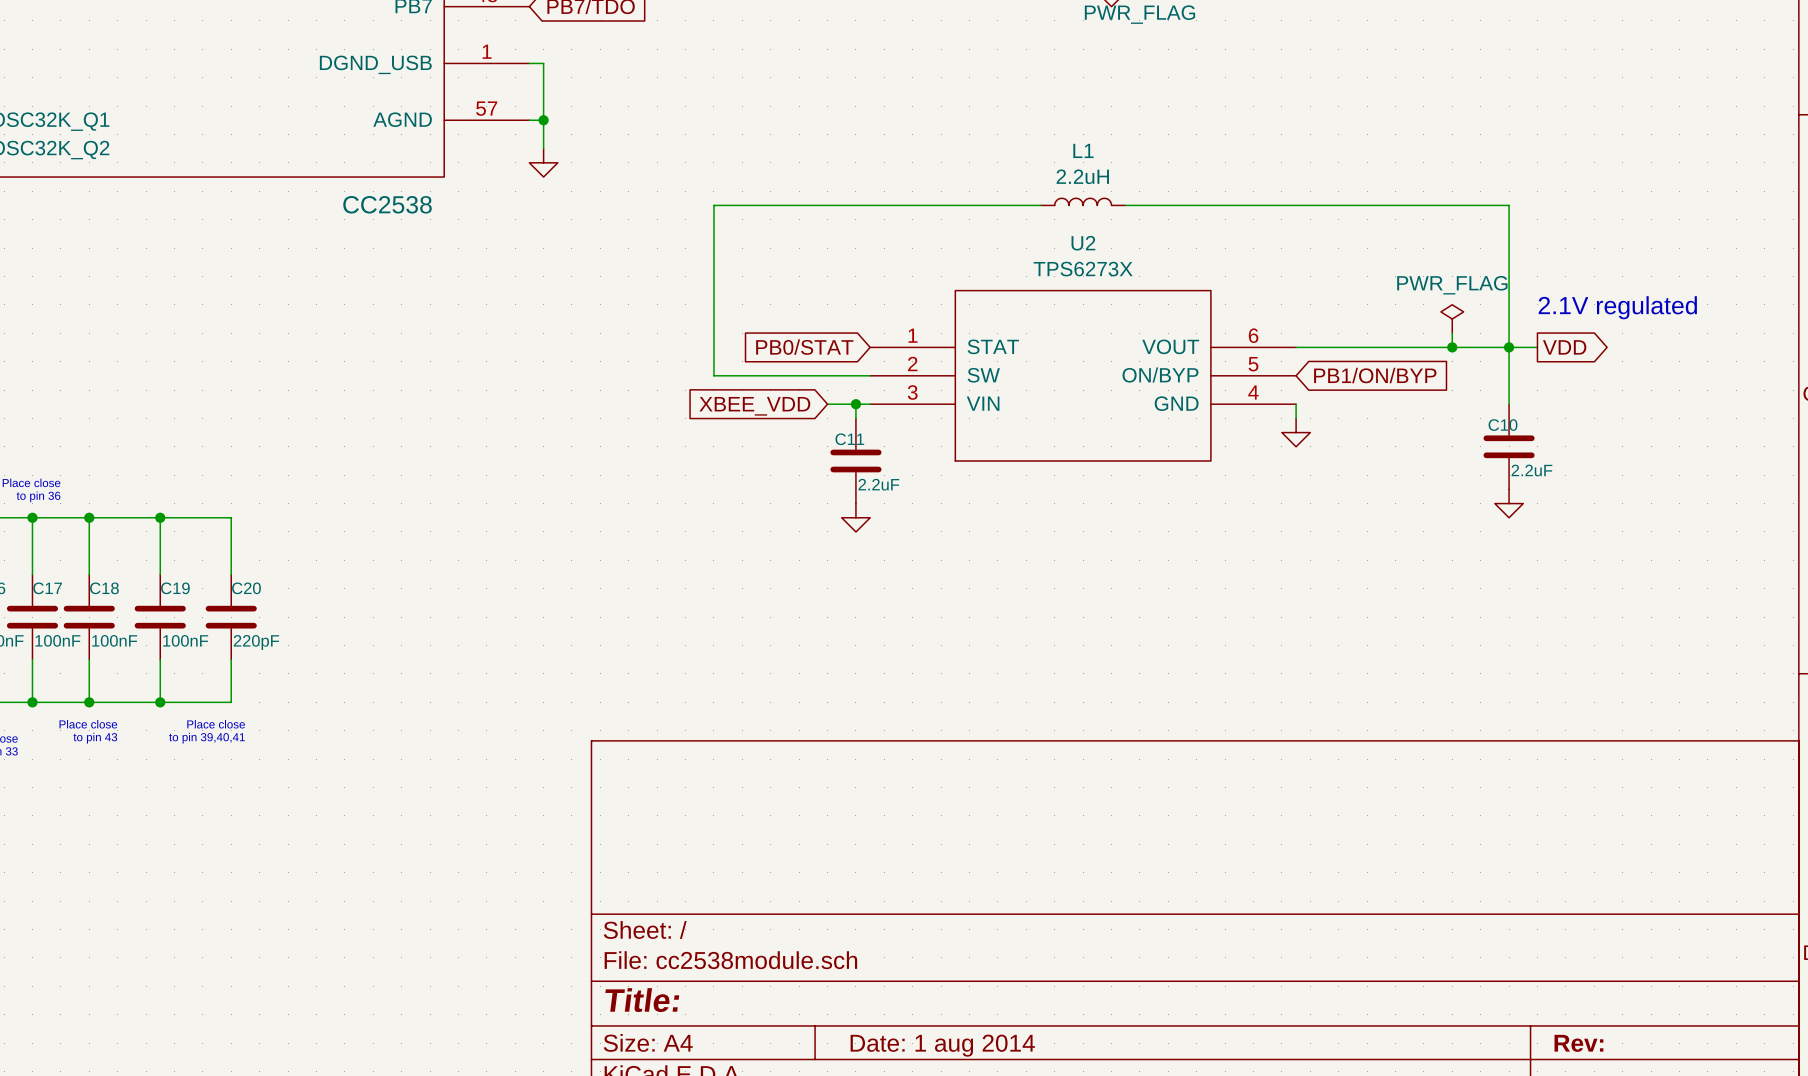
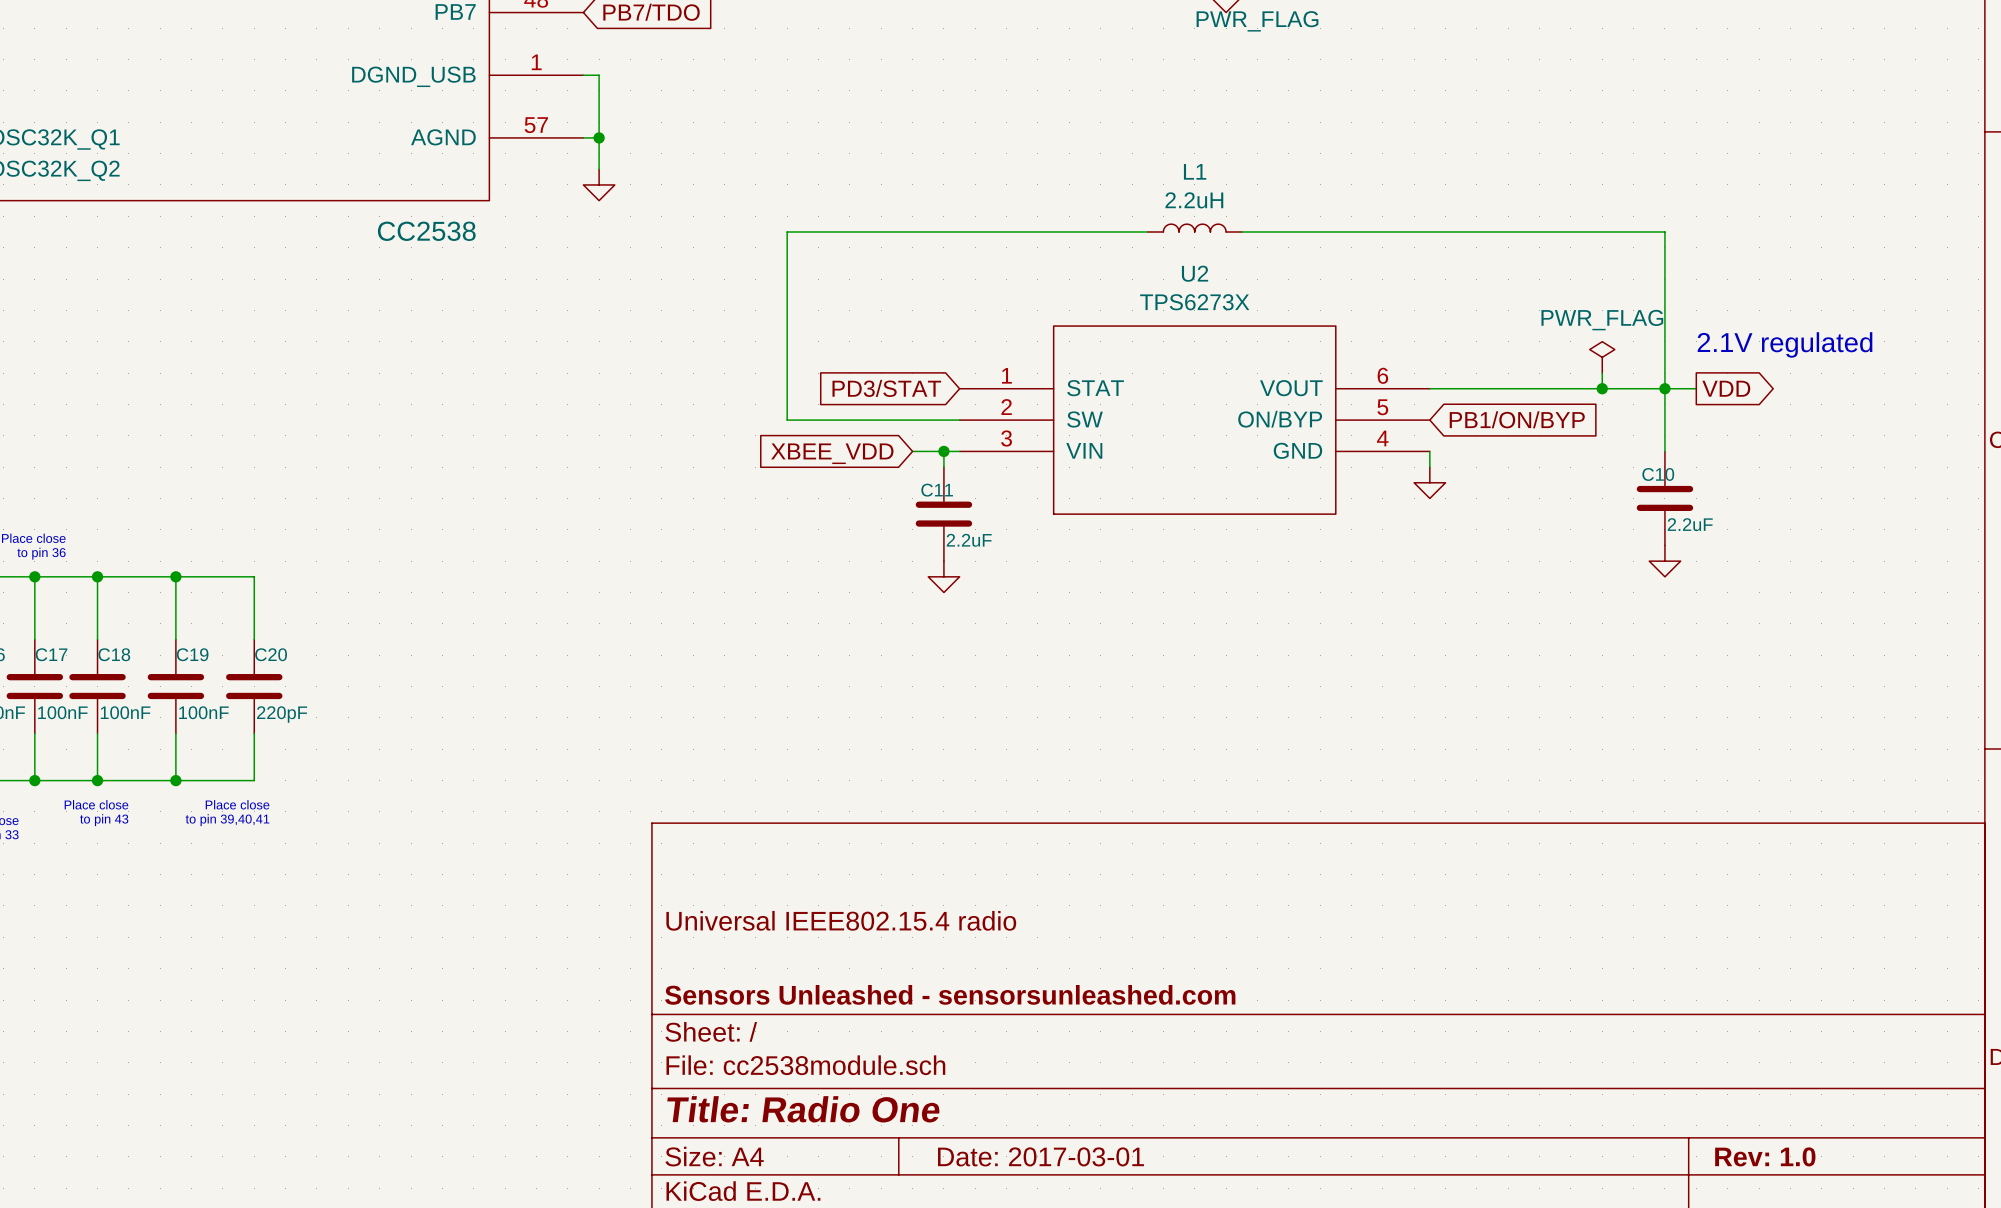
global label: PB0/STAT (804, 347) -> PD3/STAT (886, 388)
title block: none -> Universal IEEE802.15.4 radio (841, 920)
title block: none -> Sensors Unleashed - sensorsunleashed.com (950, 994)
title block: Title: (642, 1000) -> Title: Radio One (803, 1109)
title block: Rev: (1578, 1043) -> Rev: 1.0 (1765, 1156)
title block: Date: 1 aug 2014 (942, 1045) -> Date: 2017-03-01 (1040, 1156)

